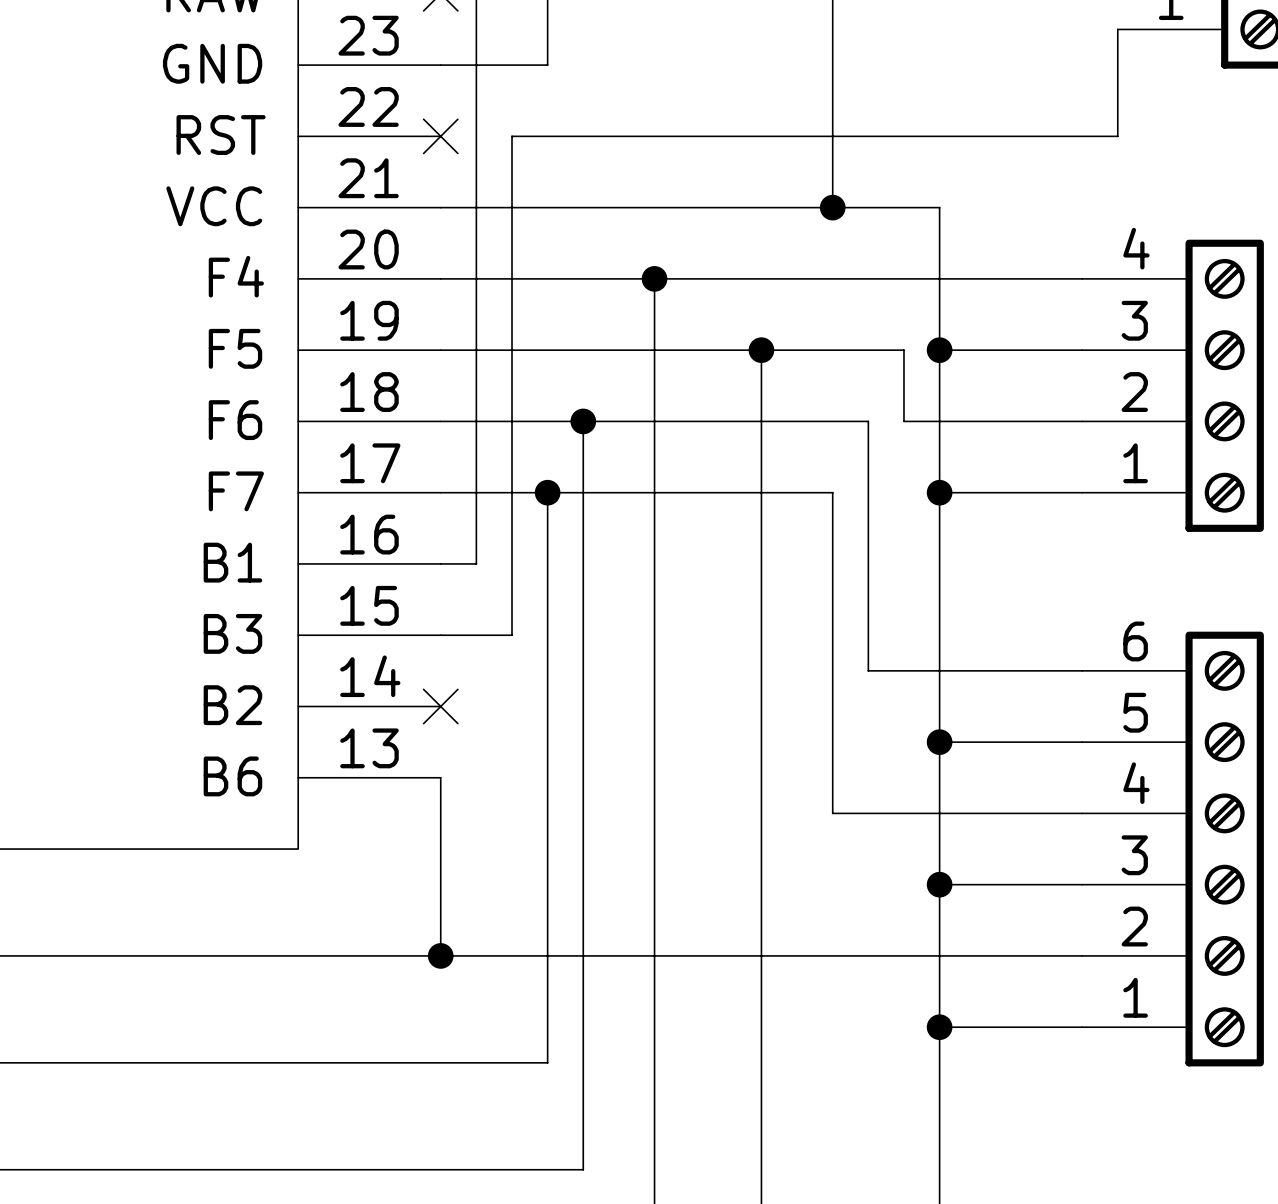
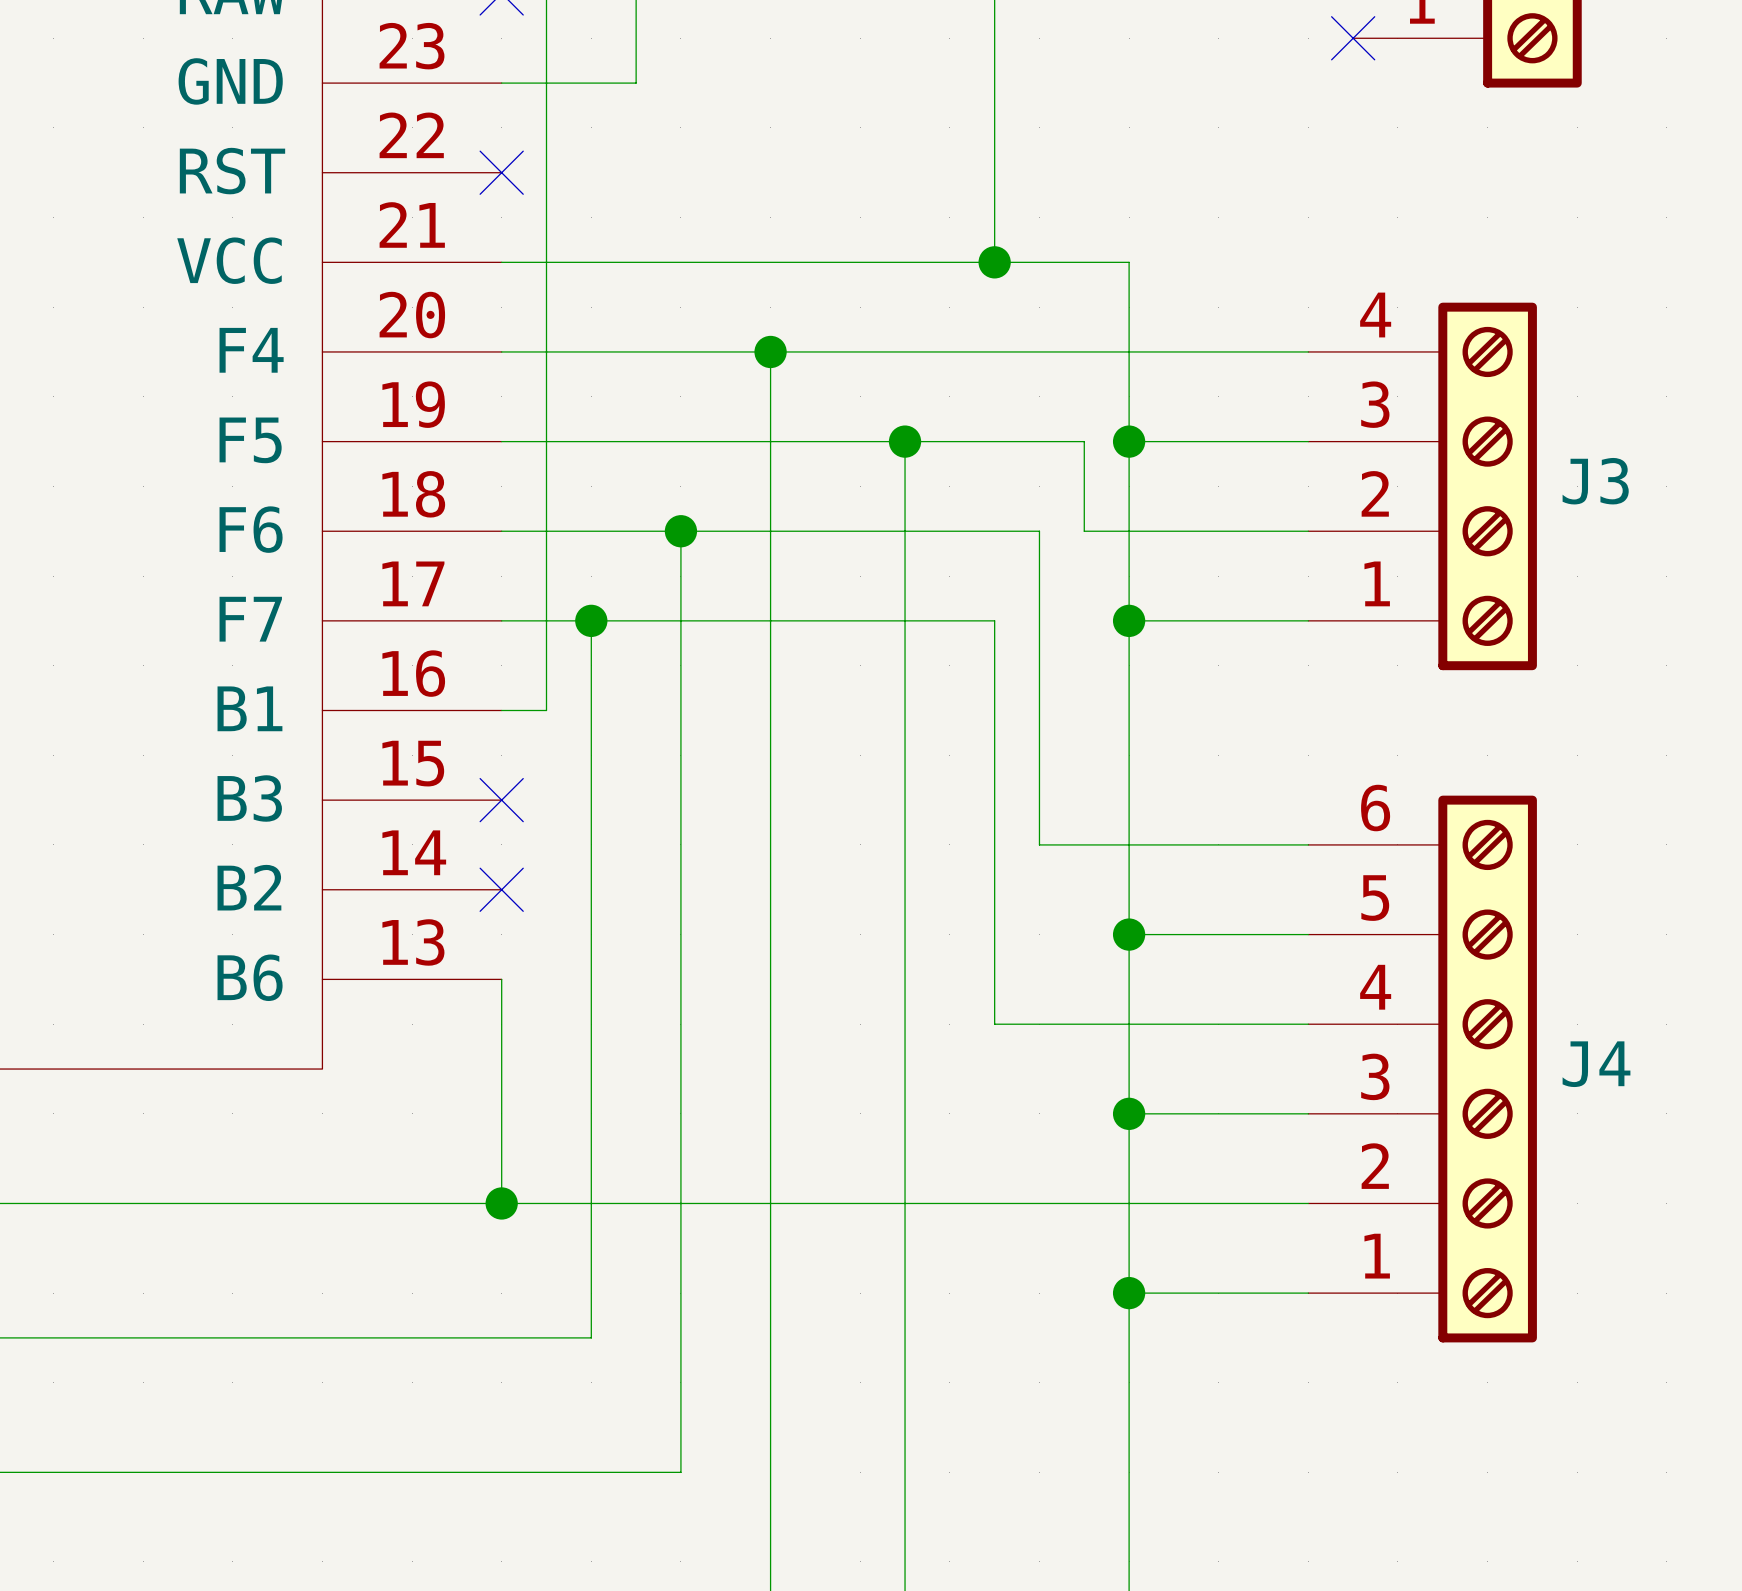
wire: (1117, 29) (1117, 136) (512, 136) (512, 492) -> none
no-connect mark: none -> (1353, 38)
wire: (547, 492) (547, 1062) (512, 1062) -> (591, 800) (591, 1337)
junction position: (547, 492) -> (591, 620)
wire: (440, 635) (512, 635) -> none
no-connect mark: none -> (501, 800)

